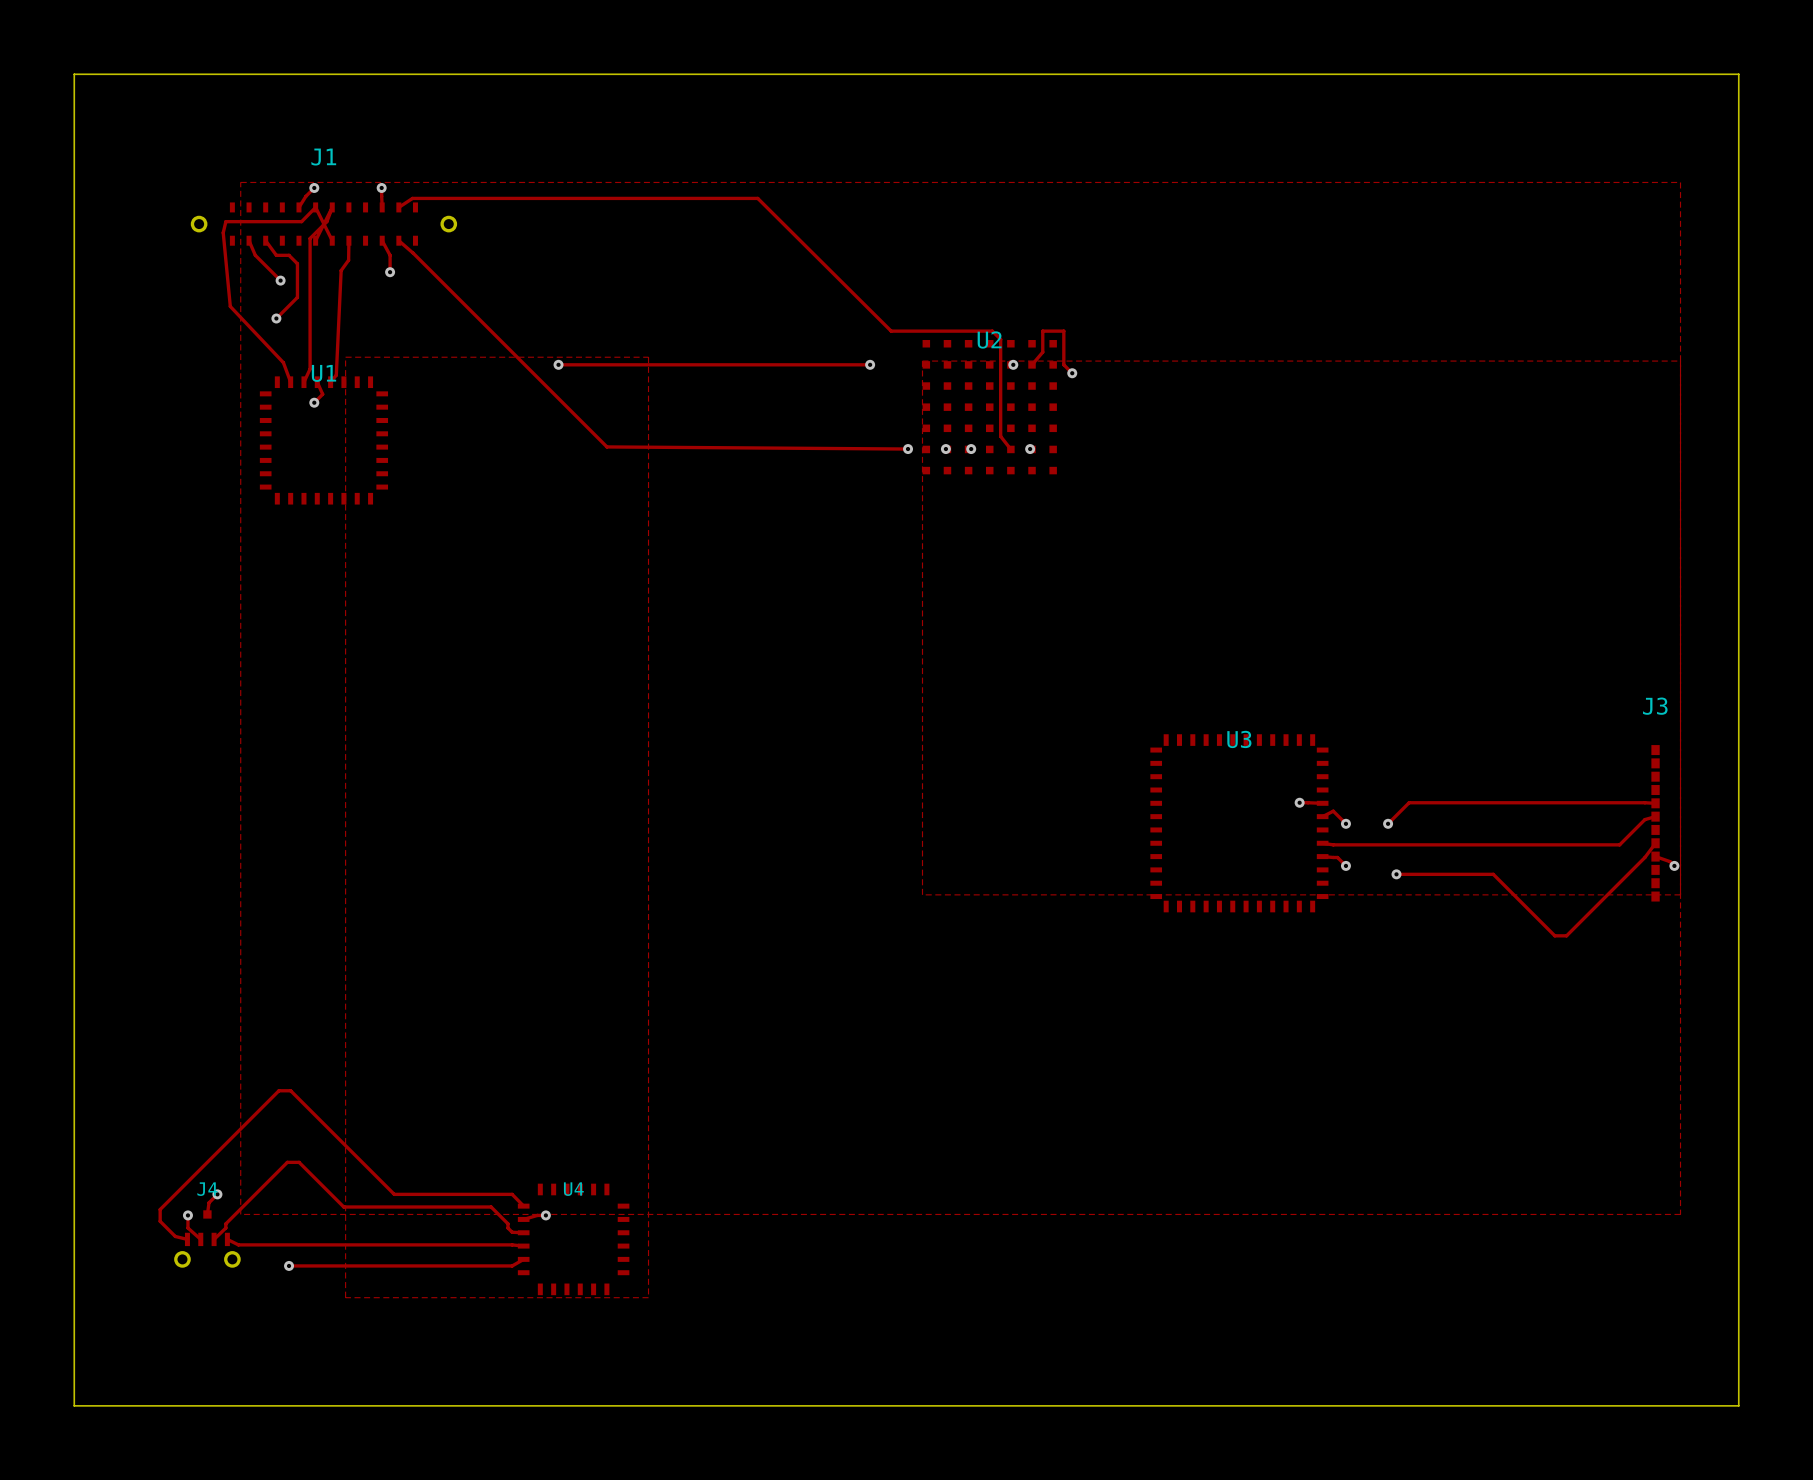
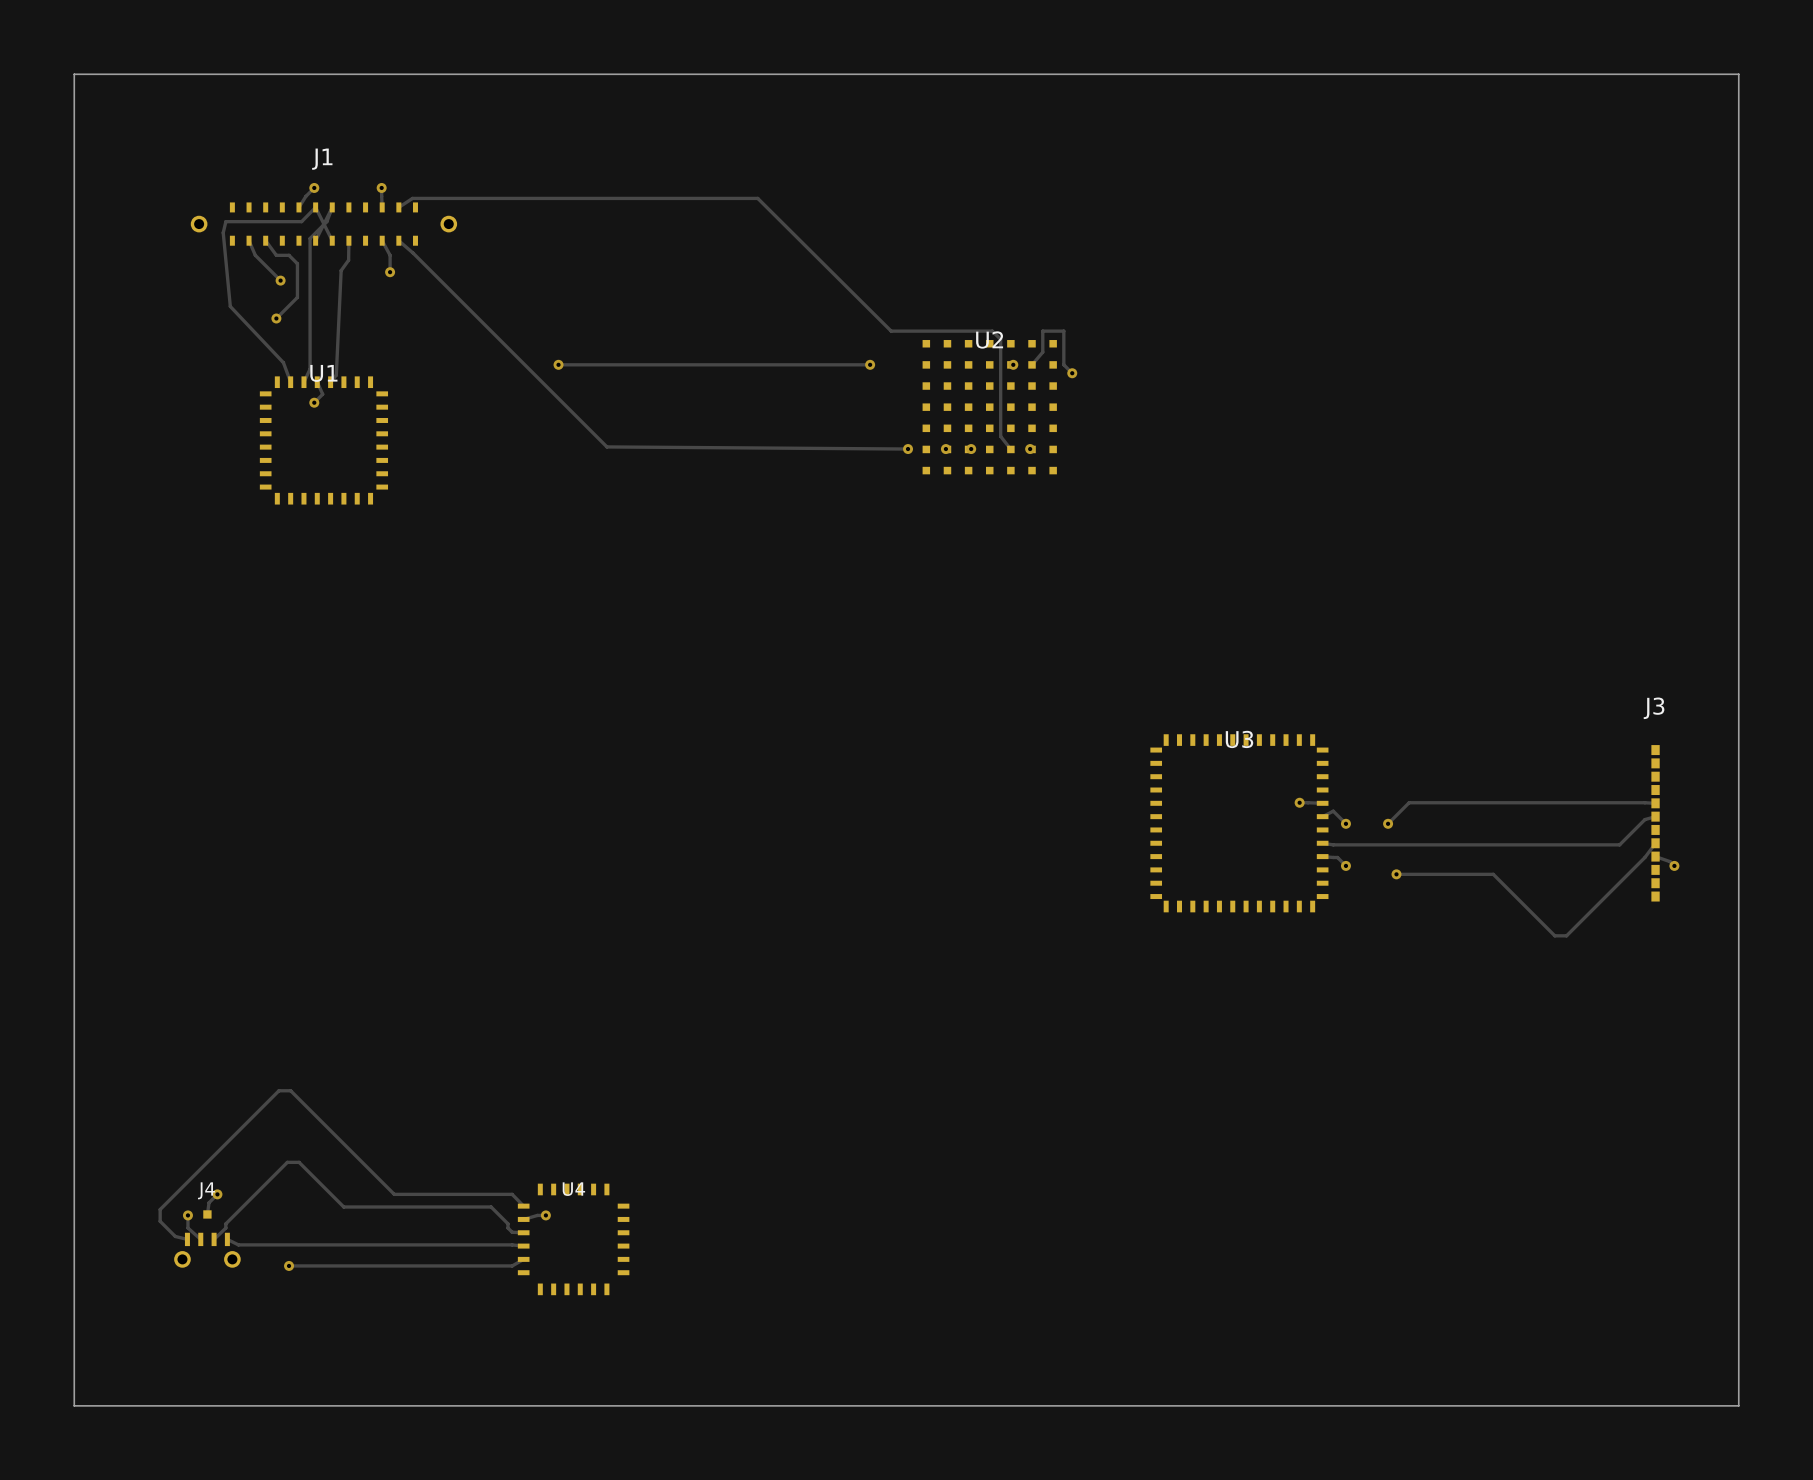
zone outline: (240, 182) (1680, 182) (1680, 1214) (240, 1214) (240, 182) -> none
zone outline: (345, 357) (648, 357) (648, 1297) (345, 1297) (345, 357) -> none
zone outline: (1680, 361) (922, 361) (922, 894) (1680, 894) -> none

